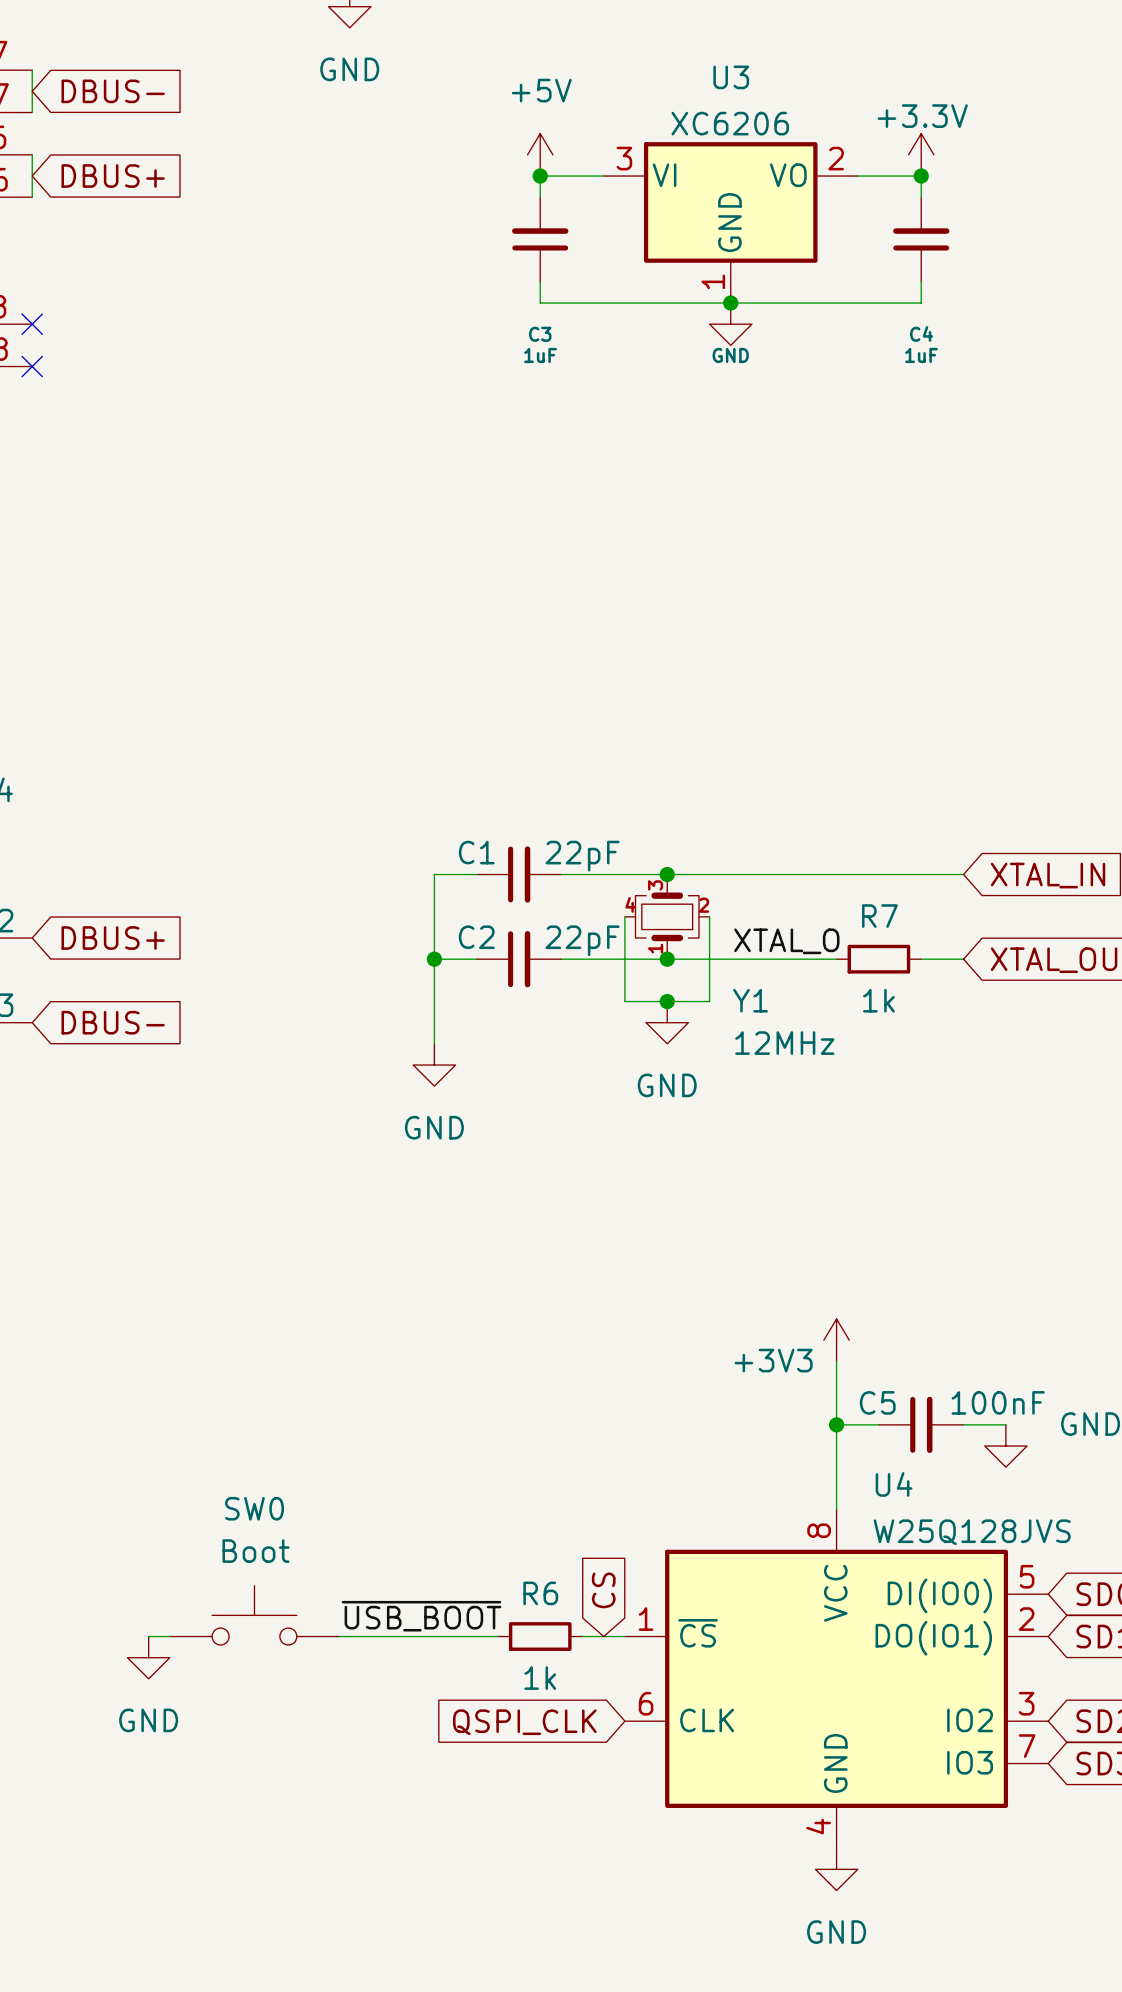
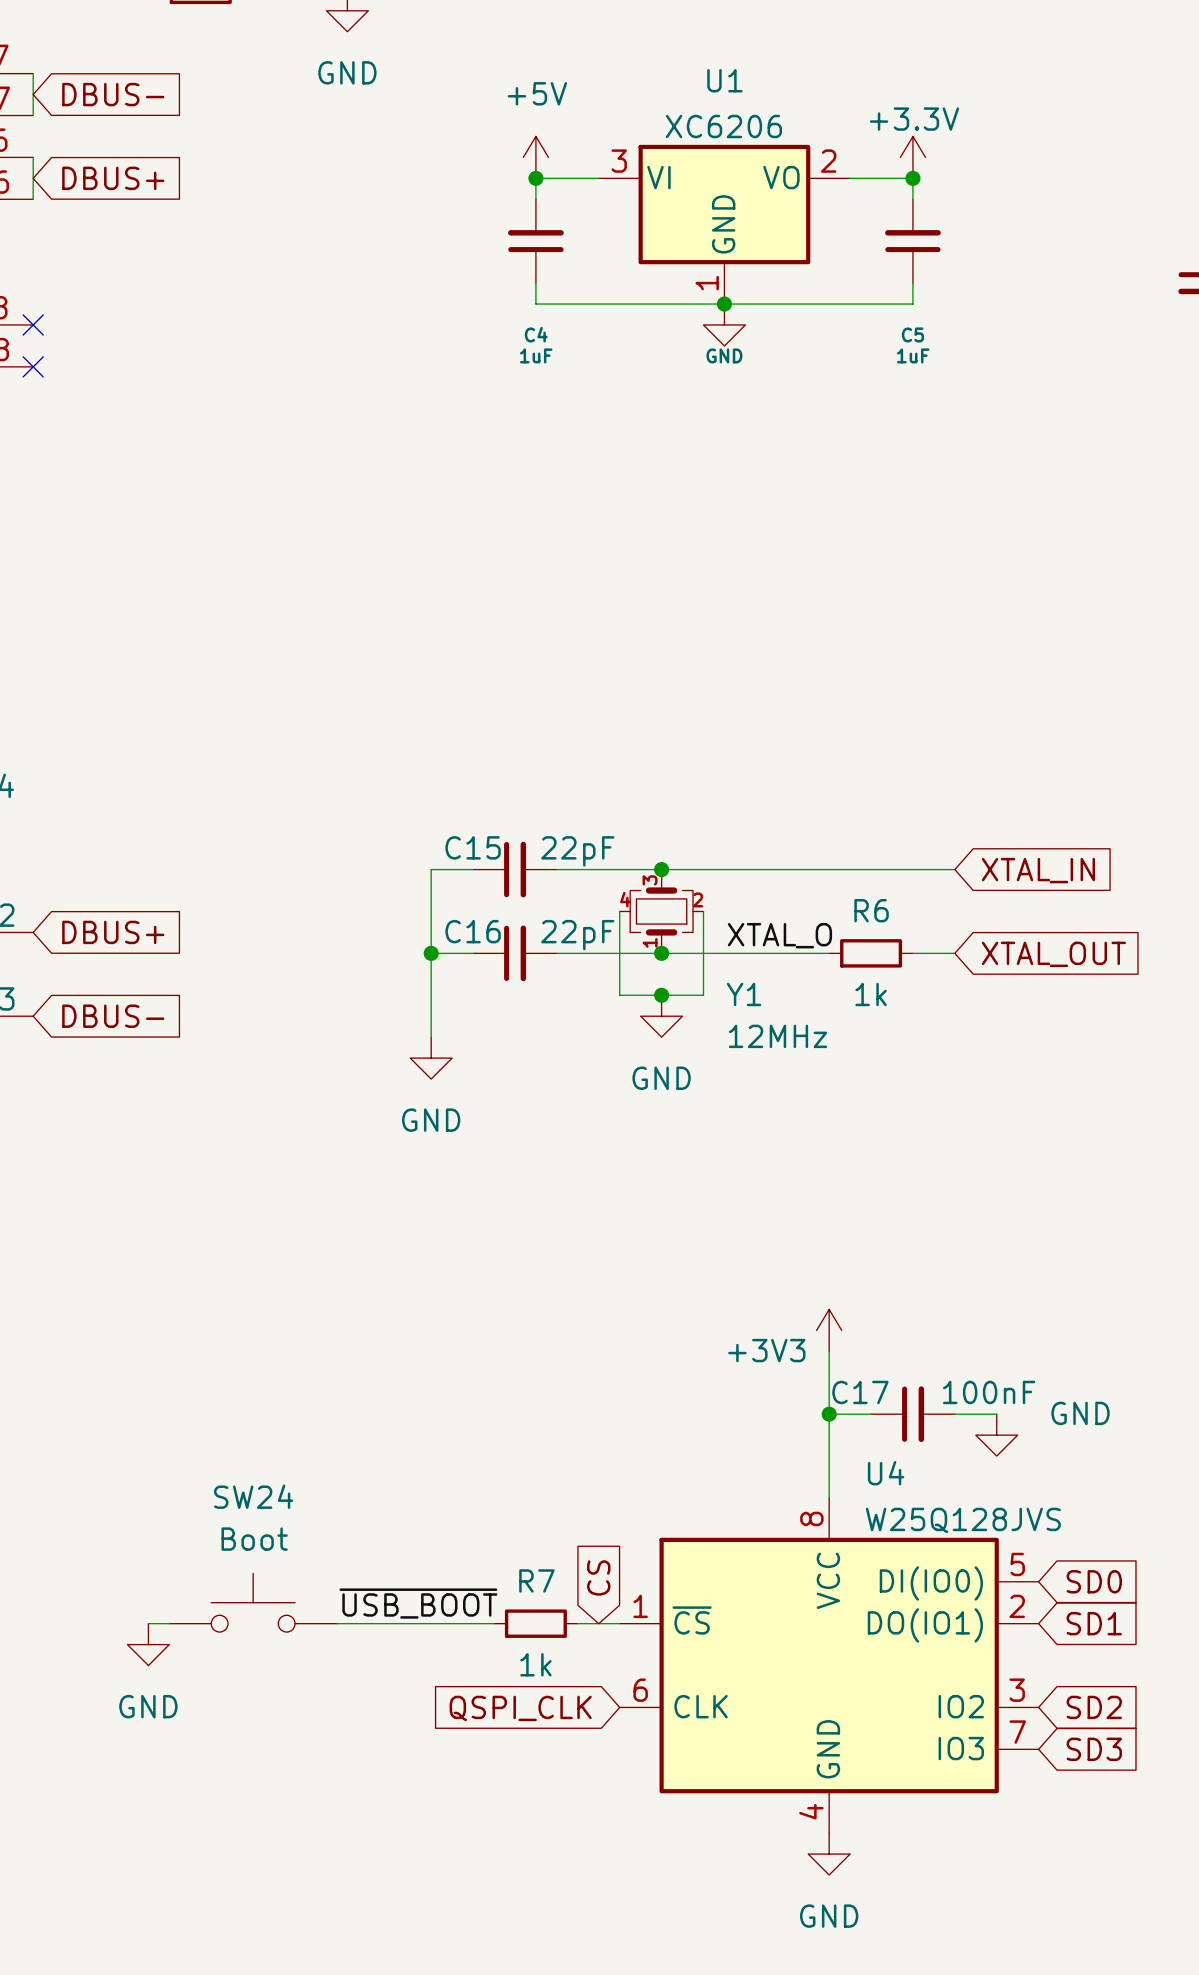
U3 name: U3 (731, 77) -> U1 (724, 80)
C4 name: C4 (921, 333) -> C5 (912, 334)
C3 name: C3 (540, 334) -> C4 (536, 334)
C1 name: C1 (476, 852) -> C15 (473, 847)
R7 name: R7 (879, 916) -> R6 (871, 910)
C2 name: C2 (476, 937) -> C16 (473, 931)
C5 name: C5 (877, 1402) -> C17 (860, 1392)
SW0 name: SW0 (254, 1508) -> SW24 (253, 1496)
R6 name: R6 (540, 1593) -> R7 (536, 1580)

